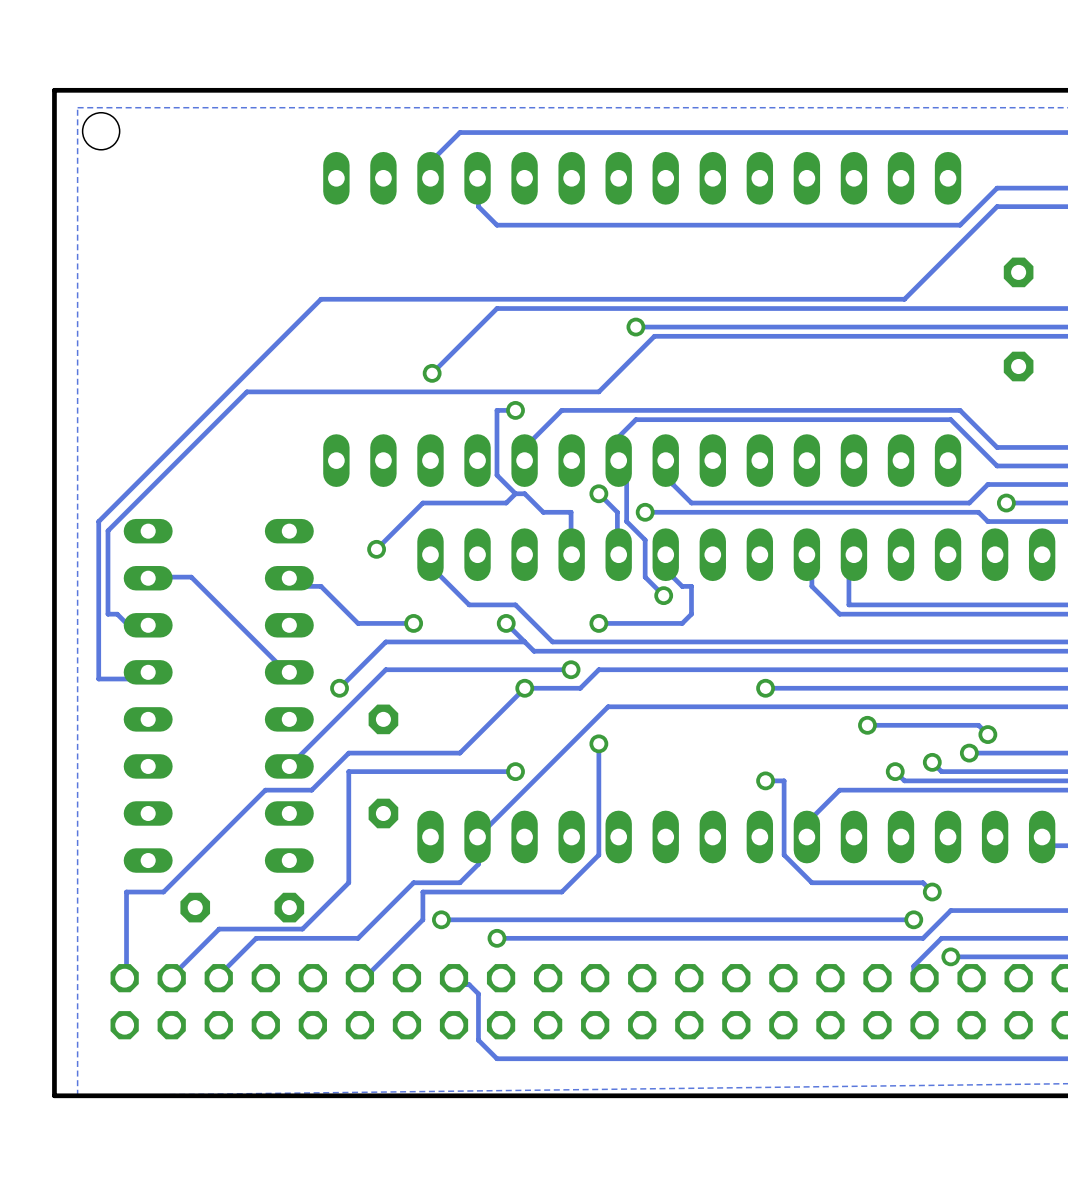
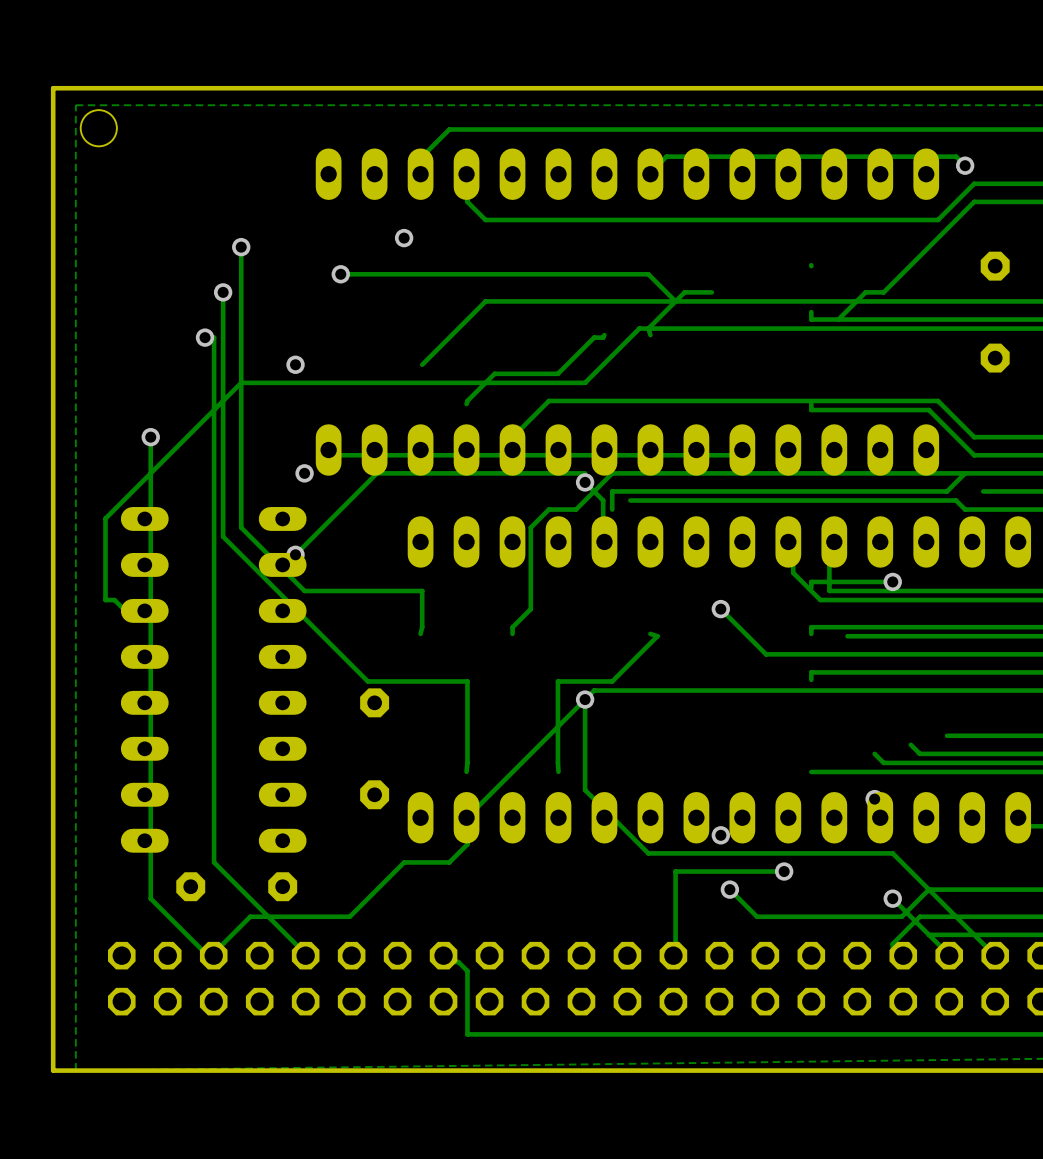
track: none -> (965, 165) (956, 156) (666, 156) (648, 174) (648, 192) (650, 197)
via: none -> (965, 165)
via: none -> (404, 238)
track: none -> (241, 247) (241, 527) (304, 590) (422, 590) (420, 633)
via: none -> (241, 247)
track: none -> (811, 265) (811, 266)
track: none -> (340, 274) (648, 274) (675, 301)
via: none -> (340, 274)
track: none -> (223, 292) (223, 536) (367, 681) (467, 681) (466, 771)
via: none -> (223, 292)
track: (700, 299) (321, 299) (98, 521) (98, 679) (145, 679) (148, 672) -> (684, 292) (648, 328) (650, 335)
track: (885, 299) (728, 299) -> (865, 292) (838, 319)
via: (635, 327) -> none
track: (830, 327) (635, 327) -> (811, 319) (811, 312)
track: none -> (604, 335) (603, 337) (594, 337) (557, 373) (494, 373) (466, 404)
track: none -> (205, 337) (214, 337) (214, 862) (305, 955)
via: none -> (205, 337)
via: none -> (295, 364)
via: (432, 373) -> none
track: (515, 410) (496, 410) (496, 475) (515, 493) -> none
via: (515, 410) -> none
track: (830, 419) (635, 419) (617, 438) (618, 460) (626, 465) (626, 503) -> (811, 410) (811, 404)
track: none -> (150, 437) (150, 898) (205, 952) (213, 955)
via: none -> (150, 437)
track: (665, 460) (672, 465) (672, 484) (691, 503) -> (612, 491) (675, 491)
track: none -> (738, 455) (322, 455)
via: none -> (304, 473)
track: none -> (585, 473) (376, 473) (295, 554)
track: none -> (965, 473) (612, 473) (576, 509) (548, 509) (530, 527) (530, 609) (512, 627) (512, 633)
track: (515, 493) (524, 493) (543, 512) (571, 512) (571, 554) -> none
track: (515, 493) (506, 503) (422, 503) (376, 549) -> none
via: (1006, 503) -> none
via: (645, 512) -> none
track: (626, 521) (645, 540) (645, 577) (663, 595) -> none
via: (376, 549) -> none
track: (430, 554) (422, 558) (469, 604) (515, 604) (552, 641) (830, 641) -> (811, 633) (811, 627)
track: (665, 554) (672, 558) (672, 577) (682, 586) (691, 586) (691, 614) (682, 623) (598, 623) -> none
via: none -> (295, 554)
track: (148, 578) (191, 577) (283, 669) (289, 672) -> none
track: (289, 578) (293, 586) (321, 586) (358, 623) (413, 623) -> none
via: (663, 595) -> none
track: none -> (892, 581) (811, 581) (811, 587)
via: none -> (892, 581)
via: (413, 623) -> none
track: (506, 623) (534, 651) (867, 651) -> none
via: (506, 623) -> none
via: (598, 623) -> none
via: none -> (720, 609)
track: (524, 641) (385, 641) (339, 688) -> none
track: none -> (650, 633) (657, 636) (612, 681) (557, 681) (558, 771)
track: (571, 669) (385, 669) (289, 766) -> none
via: (571, 669) -> none
track: (784, 669) (598, 669) (580, 688) (524, 688) (459, 753) (348, 753) (311, 790) (265, 790) (163, 892) (126, 892) (126, 975) (124, 978) -> (766, 654) (720, 609)
via: (339, 688) -> none
via: (524, 688) -> none
via: (765, 688) -> none
track: (830, 688) (765, 688) -> (811, 672) (811, 679)
track: none -> (585, 699) (585, 726)
via: none -> (585, 699)
track: (867, 725) (978, 725) (987, 734) -> none
via: (867, 725) -> none
via: (987, 734) -> none
via: (598, 743) -> none
via: (969, 753) -> none
via: (932, 762) -> none
track: (515, 771) (348, 771) (348, 882) (302, 929) (219, 929) (171, 978) -> none
via: (515, 771) -> none
via: (895, 771) -> none
track: (765, 780) (784, 780) (784, 854) (811, 882) (923, 882) -> (585, 790) (648, 853) (892, 853) (901, 862)
via: (765, 780) -> none
track: (839, 790) (811, 817) (811, 836) (806, 837) -> (820, 771) (811, 771)
track: (598, 808) (598, 854) (561, 892) (422, 892) (422, 919) (367, 975) (359, 978) -> none
via: none -> (874, 799)
via: none -> (720, 835)
track: none -> (784, 871) (675, 871) (675, 952) (673, 955)
via: none -> (784, 871)
track: none -> (910, 871) (995, 955)
via: (932, 892) -> none
via: none -> (729, 889)
via: (441, 919) -> none
track: (913, 919) (441, 919) -> (892, 898) (949, 955)
via: (496, 938) -> none
track: (774, 938) (496, 938) -> (757, 916) (729, 889)
via: (950, 956) -> none
track: (478, 1040) (496, 1058) -> (467, 1016) (467, 1034) (485, 1034)

